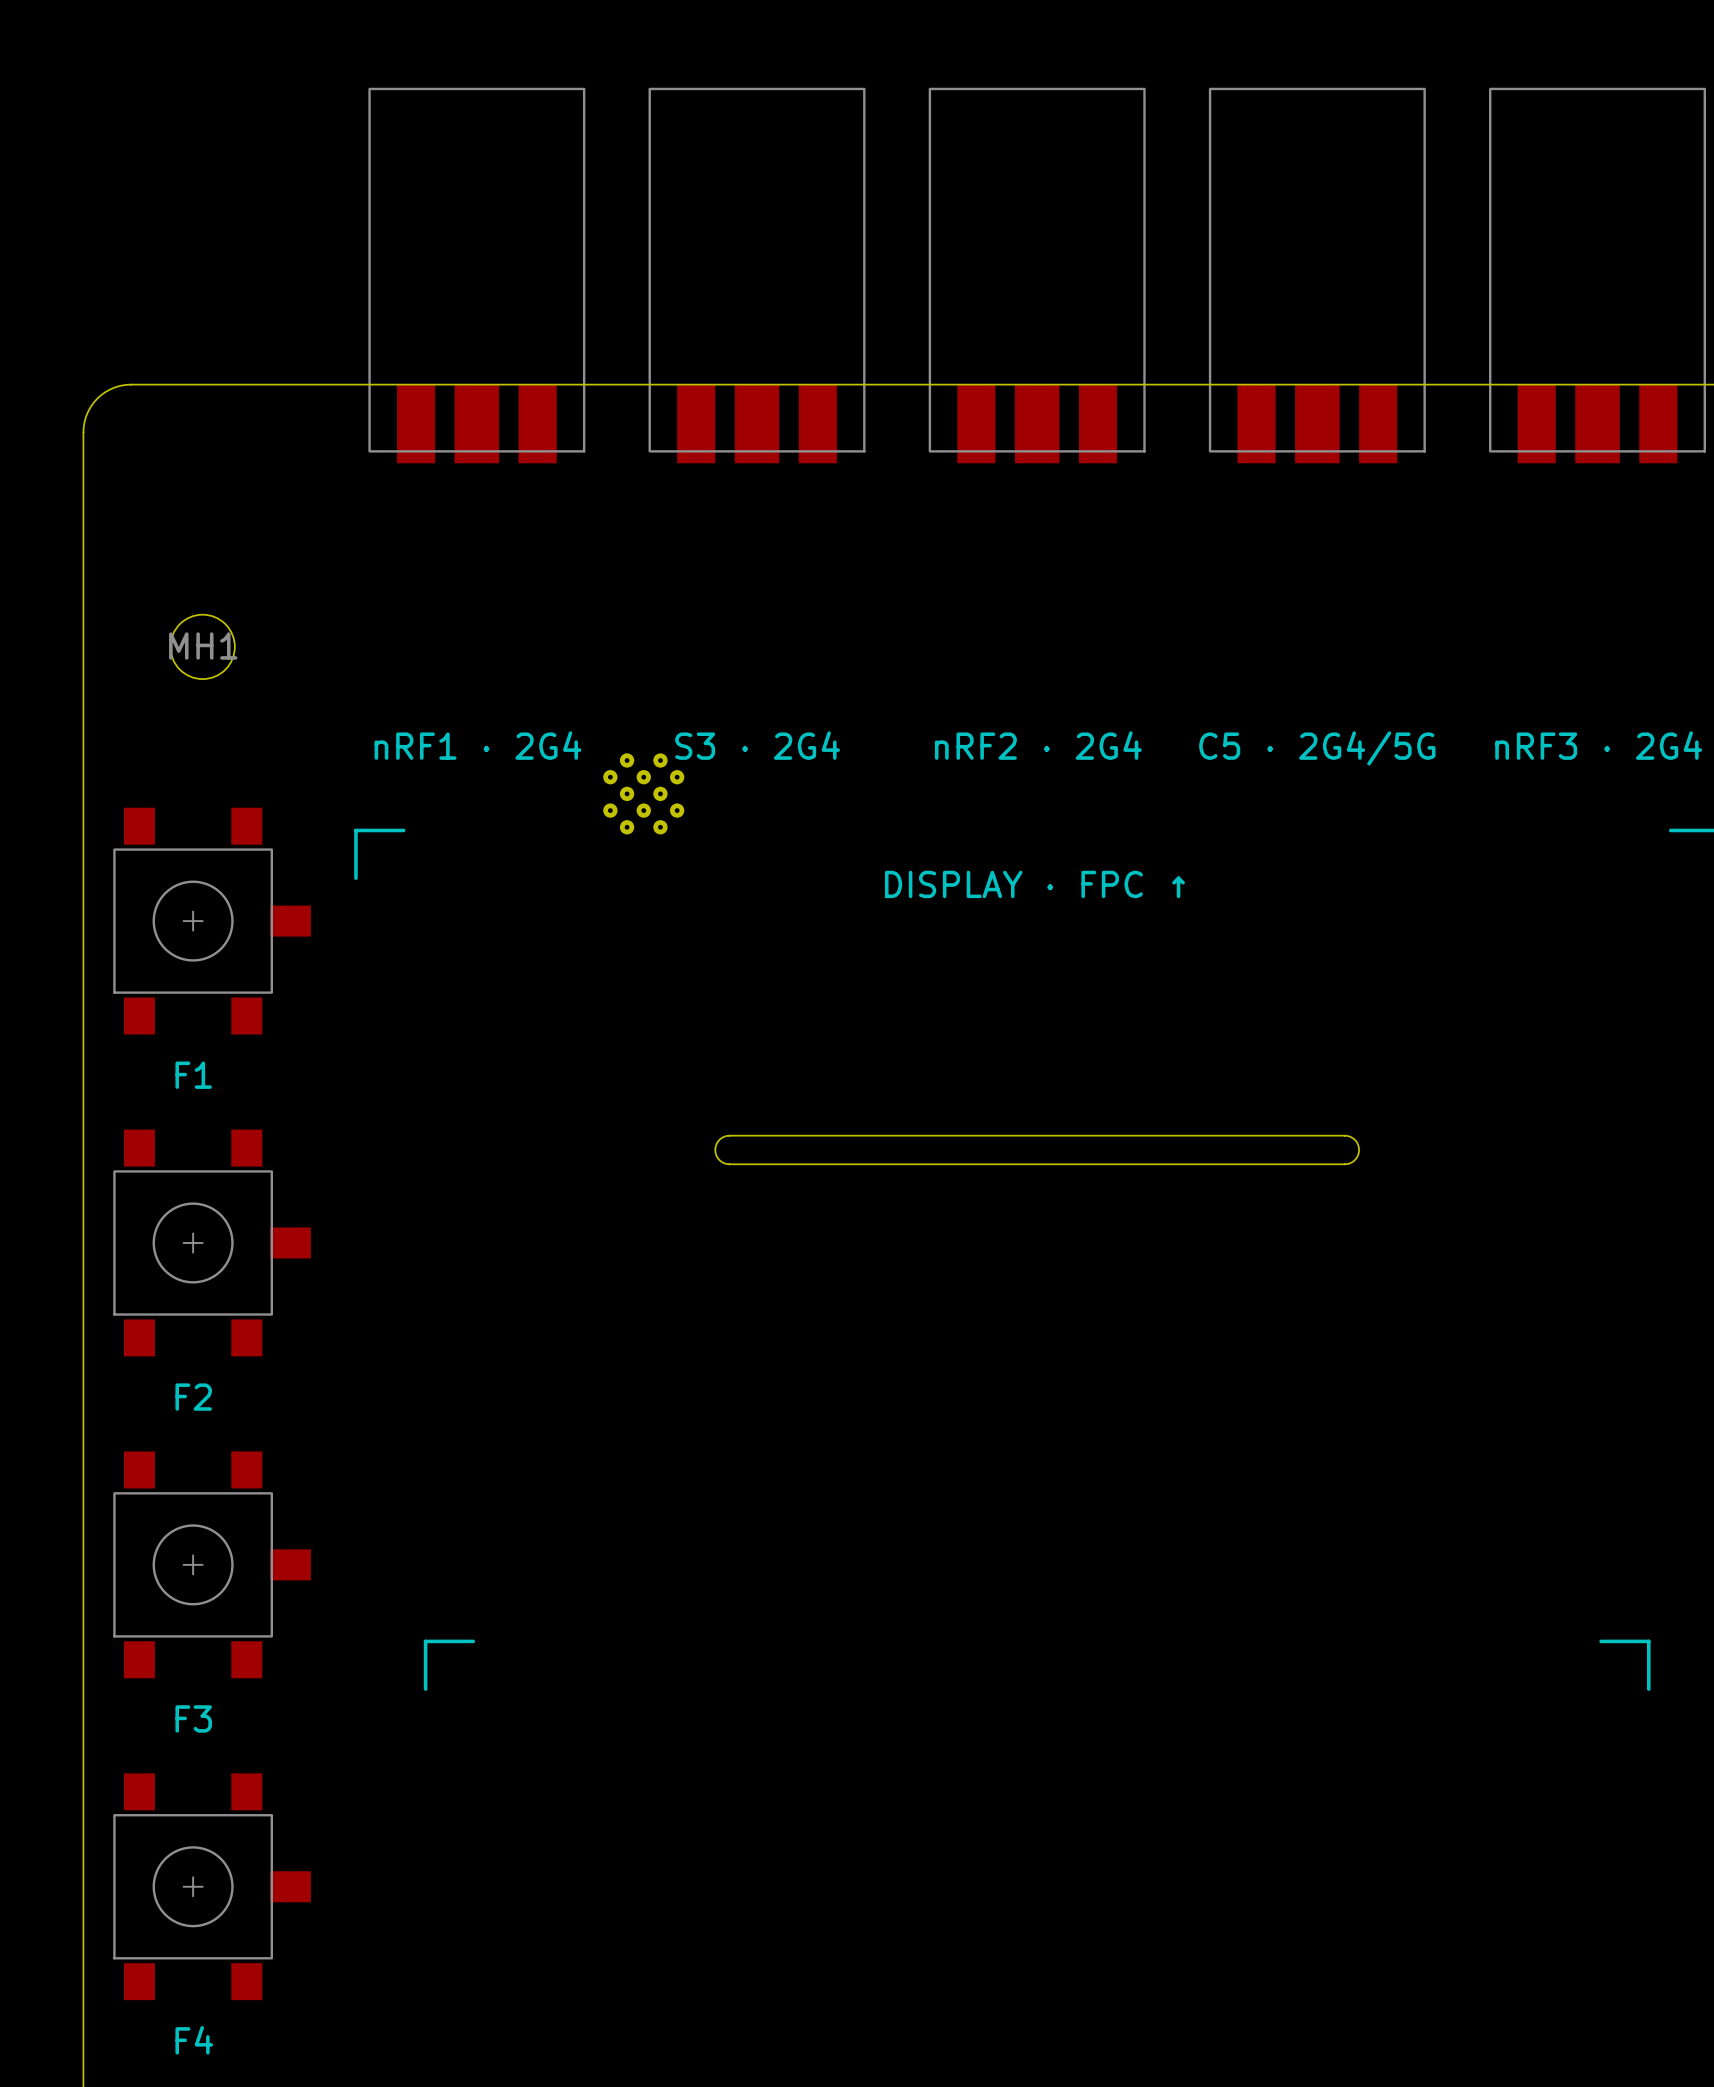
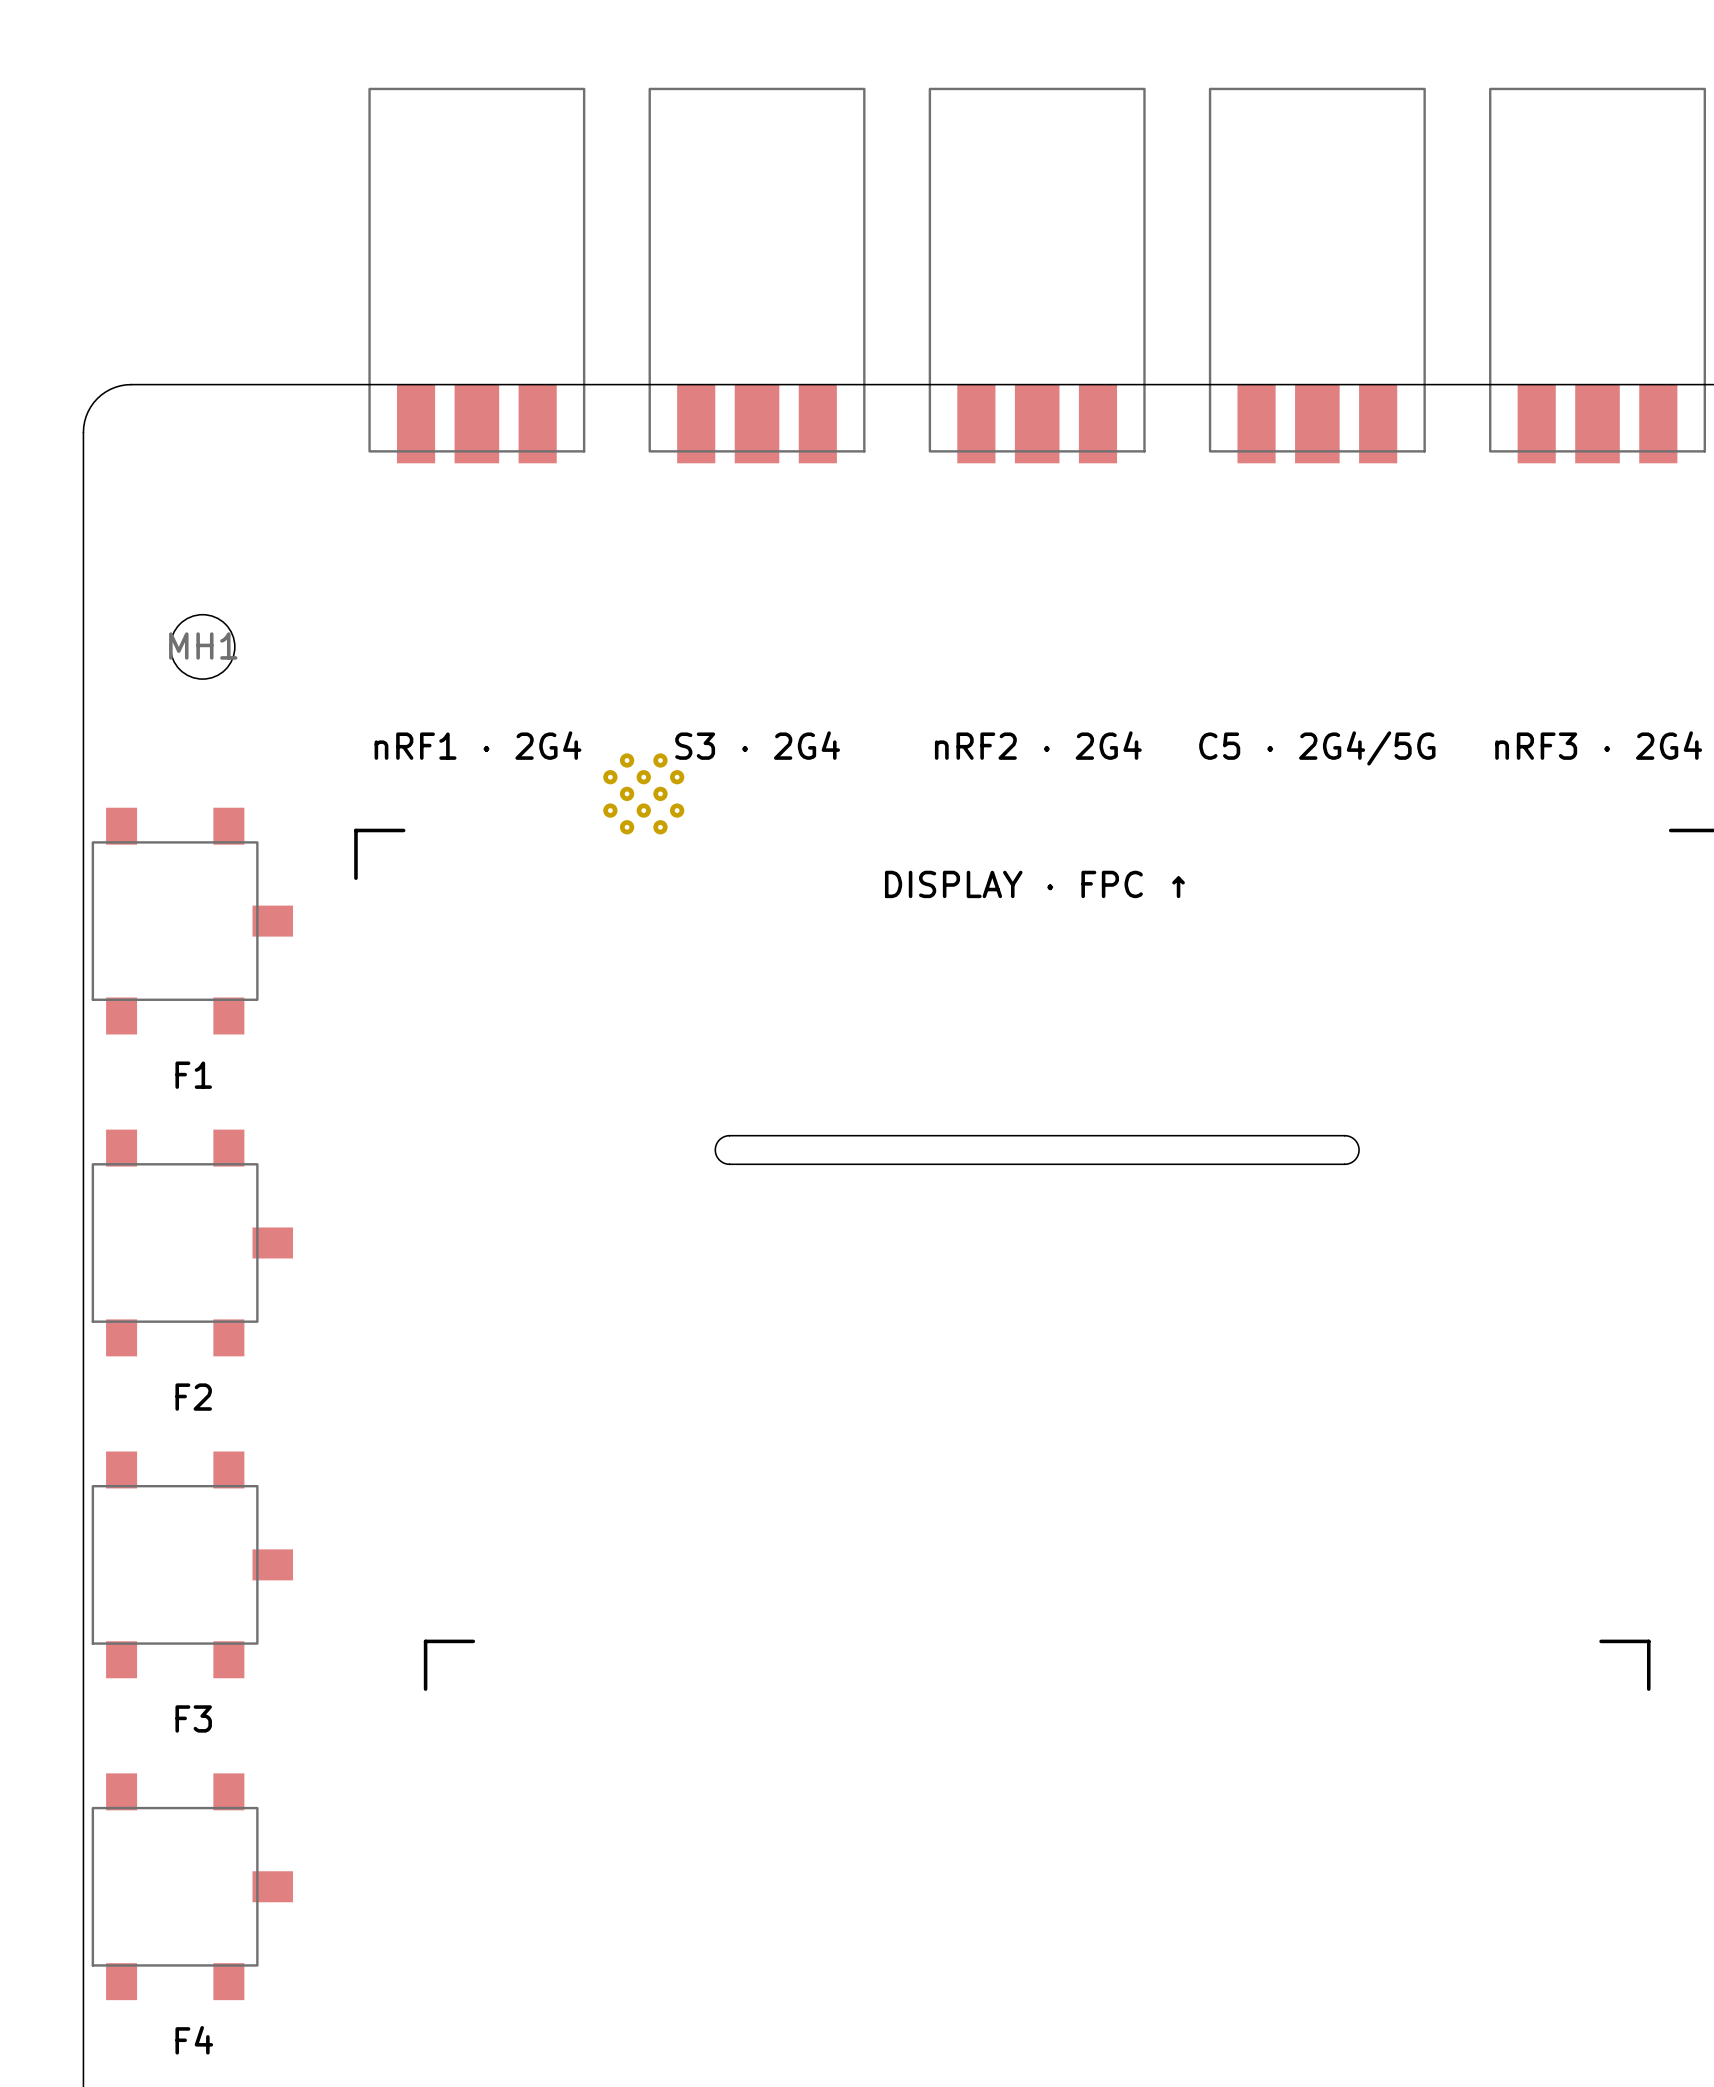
part footprint: [113, 807, 311, 1035] -> [91, 807, 294, 1035]
part footprint: [113, 1129, 311, 1357] -> [91, 1129, 294, 1357]
part footprint: [113, 1451, 311, 1679] -> [91, 1451, 294, 1679]
part footprint: [113, 1773, 311, 2001] -> [91, 1773, 294, 2001]

